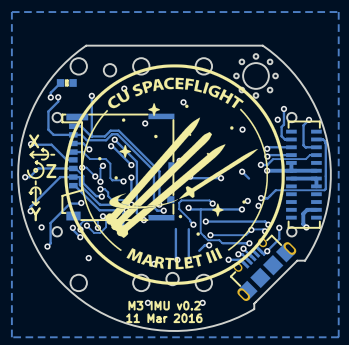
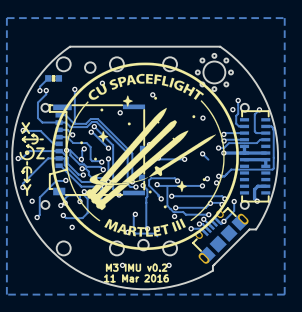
track: none -> (70, 152) (70, 155) (79, 164) (86, 166) (100, 166) (103, 169)
via: (95, 176) -> none
via: none -> (81, 159)
via: (100, 181) -> none
via: none -> (103, 169)
track: none -> (143, 185) (147, 189) (146, 202)
via: none -> (143, 185)
track: none -> (83, 190) (83, 194) (87, 198) (87, 213) (82, 218) (66, 218) (63, 215)
track: (102, 216) (106, 219) (106, 227) (100, 232) (94, 232) (86, 225) -> none
via: (86, 225) -> none
track: (72, 227) (80, 237) -> none
via: (72, 227) -> none
track: (188, 229) (188, 260) -> none
via: none -> (60, 205)
via: (80, 237) -> none
track: none -> (135, 214) (133, 231) (135, 233) (154, 233) (157, 236)
via: none -> (135, 214)
via: none -> (63, 215)
track: (209, 245) (204, 245) (199, 250) -> none

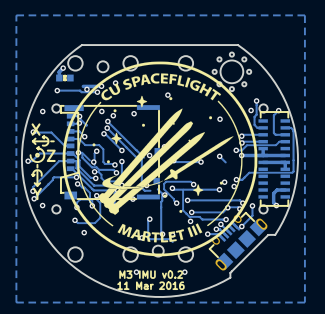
via: none -> (63, 68)
track: (48, 78) (39, 86) (39, 90) -> (59, 78) (59, 71) (63, 68)
track: none -> (101, 86) (83, 86)
via: none -> (101, 86)
track: (74, 89) (74, 123) (85, 123) (90, 119) (97, 119) (132, 153) (132, 181) -> none
via: (39, 90) -> none
track: (46, 90) (46, 94) (37, 102) (37, 118) (42, 122) (59, 122) -> (57, 90) (97, 92)
via: none -> (97, 92)
via: none -> (42, 111)
via: none -> (101, 111)
via: none -> (113, 115)
via: none -> (79, 116)
via: none -> (107, 121)
via: none -> (79, 123)
track: (66, 122) (70, 127) (86, 127) (92, 121) (96, 121) (122, 147) -> (109, 123) (136, 150)
track: (113, 145) (113, 189) (119, 195) -> (126, 147) (135, 156)
via: none -> (149, 155)
track: none -> (76, 177) (54, 177) (52, 179)
via: none -> (76, 177)
track: none -> (53, 179) (48, 184)
track: none -> (48, 184) (34, 198)
track: (65, 180) (56, 180) (39, 197) (39, 214) (37, 217) -> none
track: none -> (79, 184) (90, 192) (90, 202) (92, 204)
via: (143, 185) -> none
via: (135, 186) -> none
via: none -> (164, 194)
via: none -> (34, 198)
via: (60, 205) -> none
via: (37, 217) -> none

